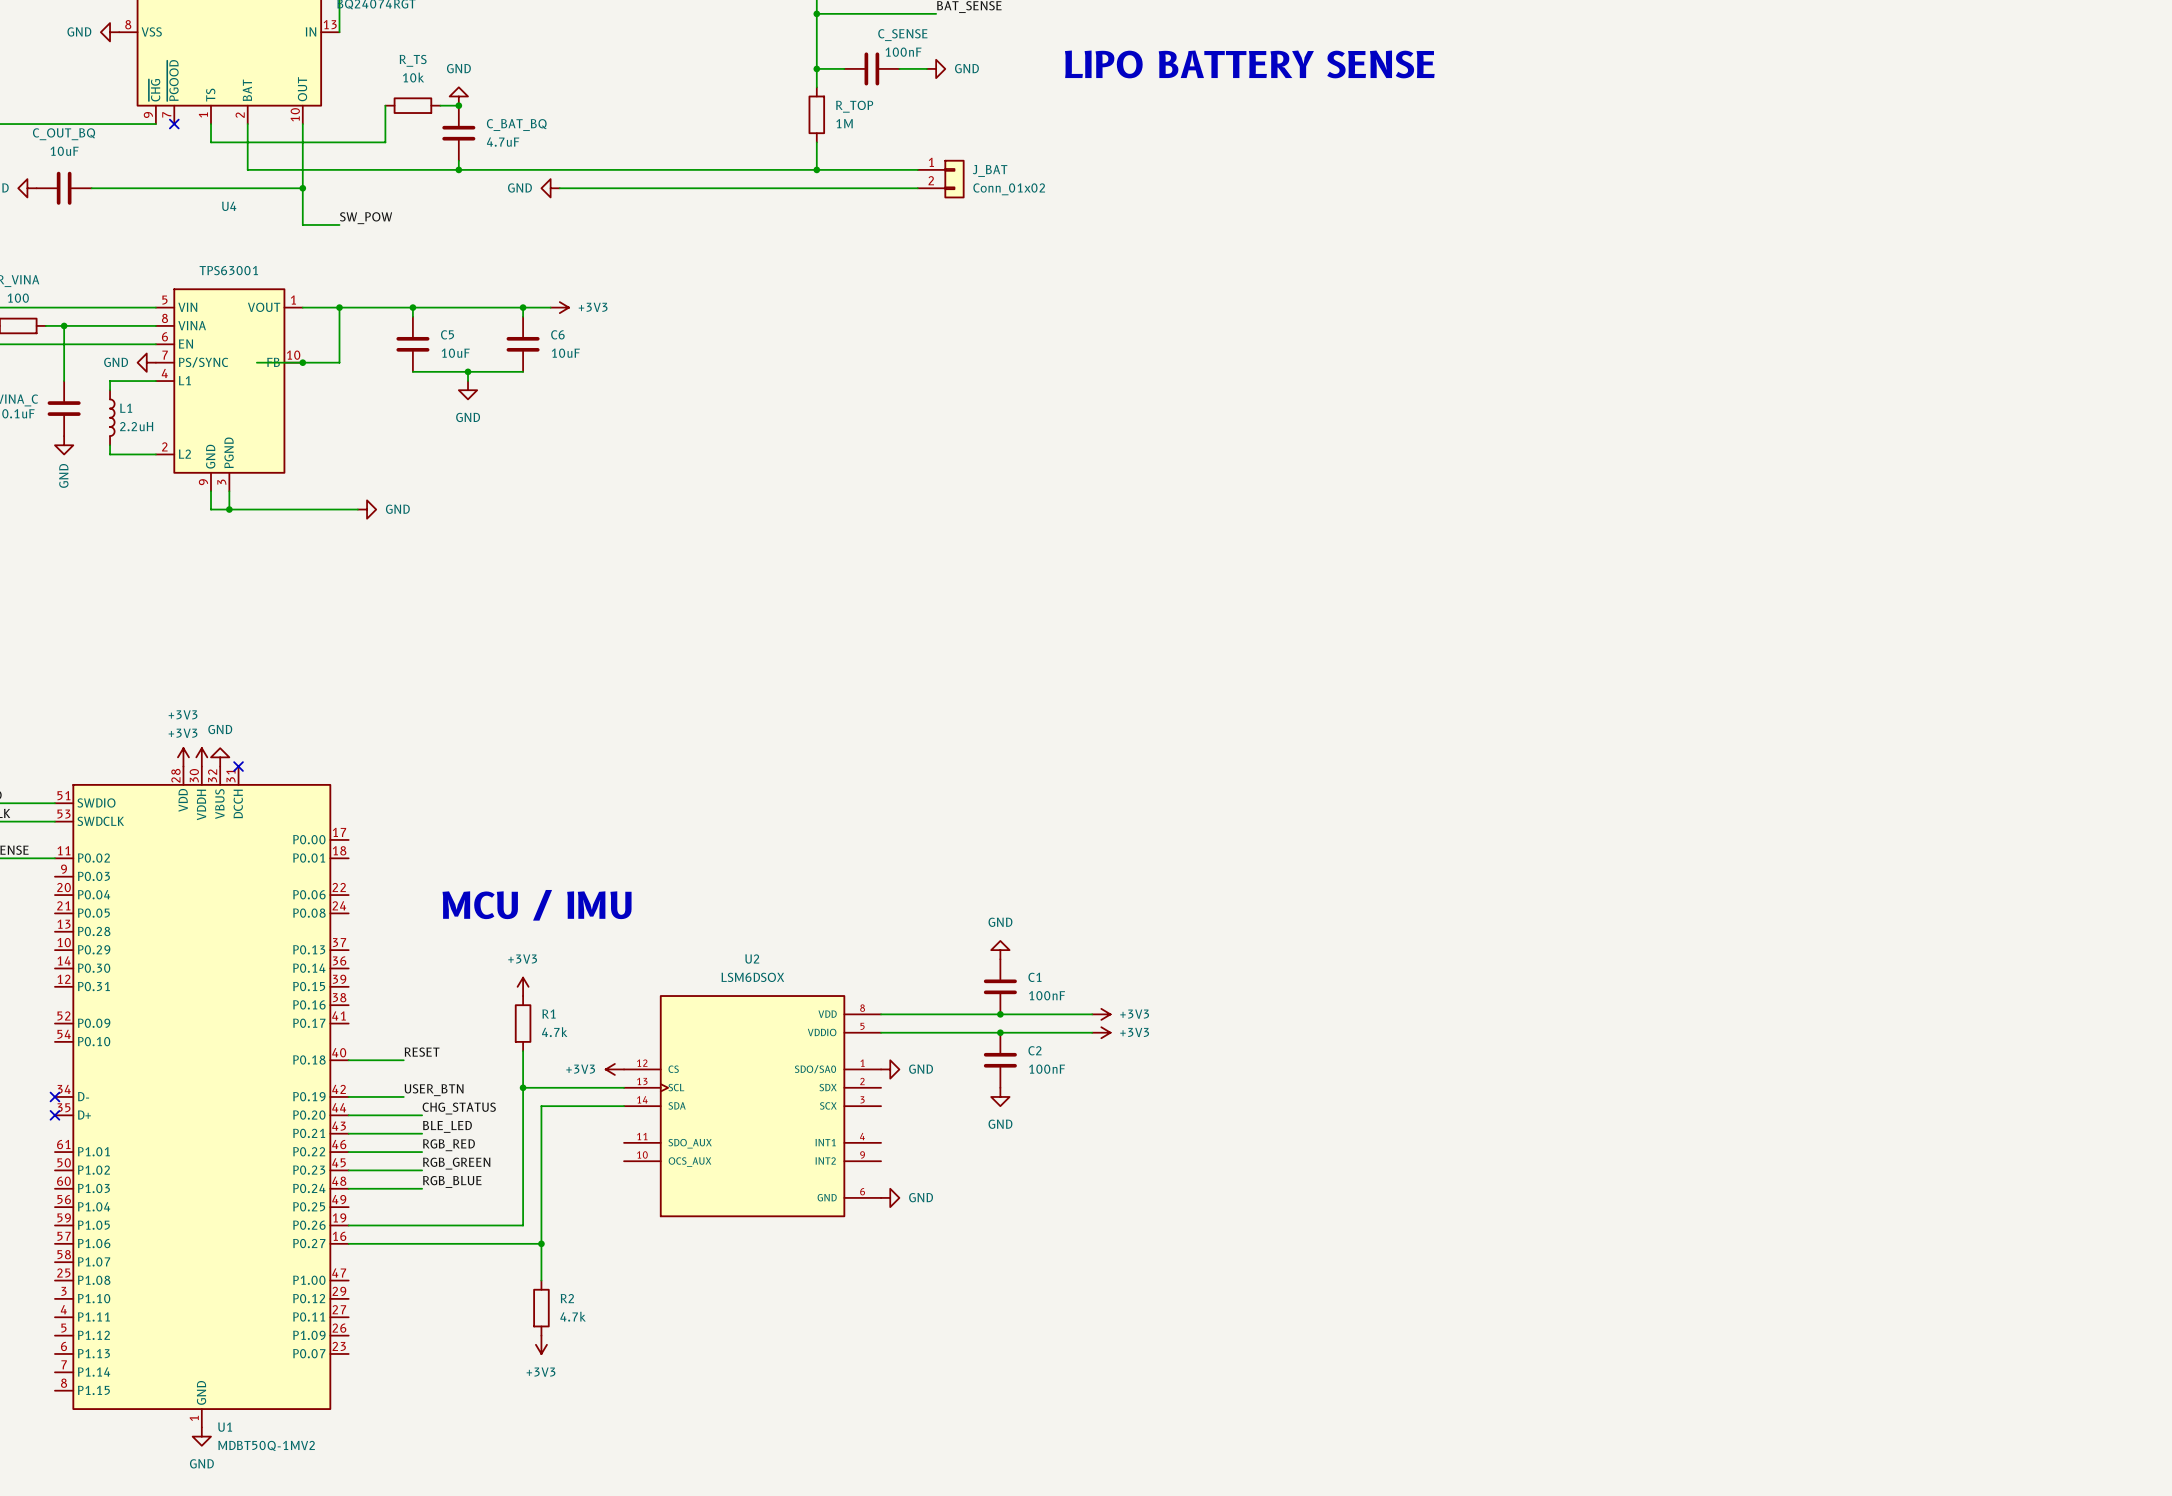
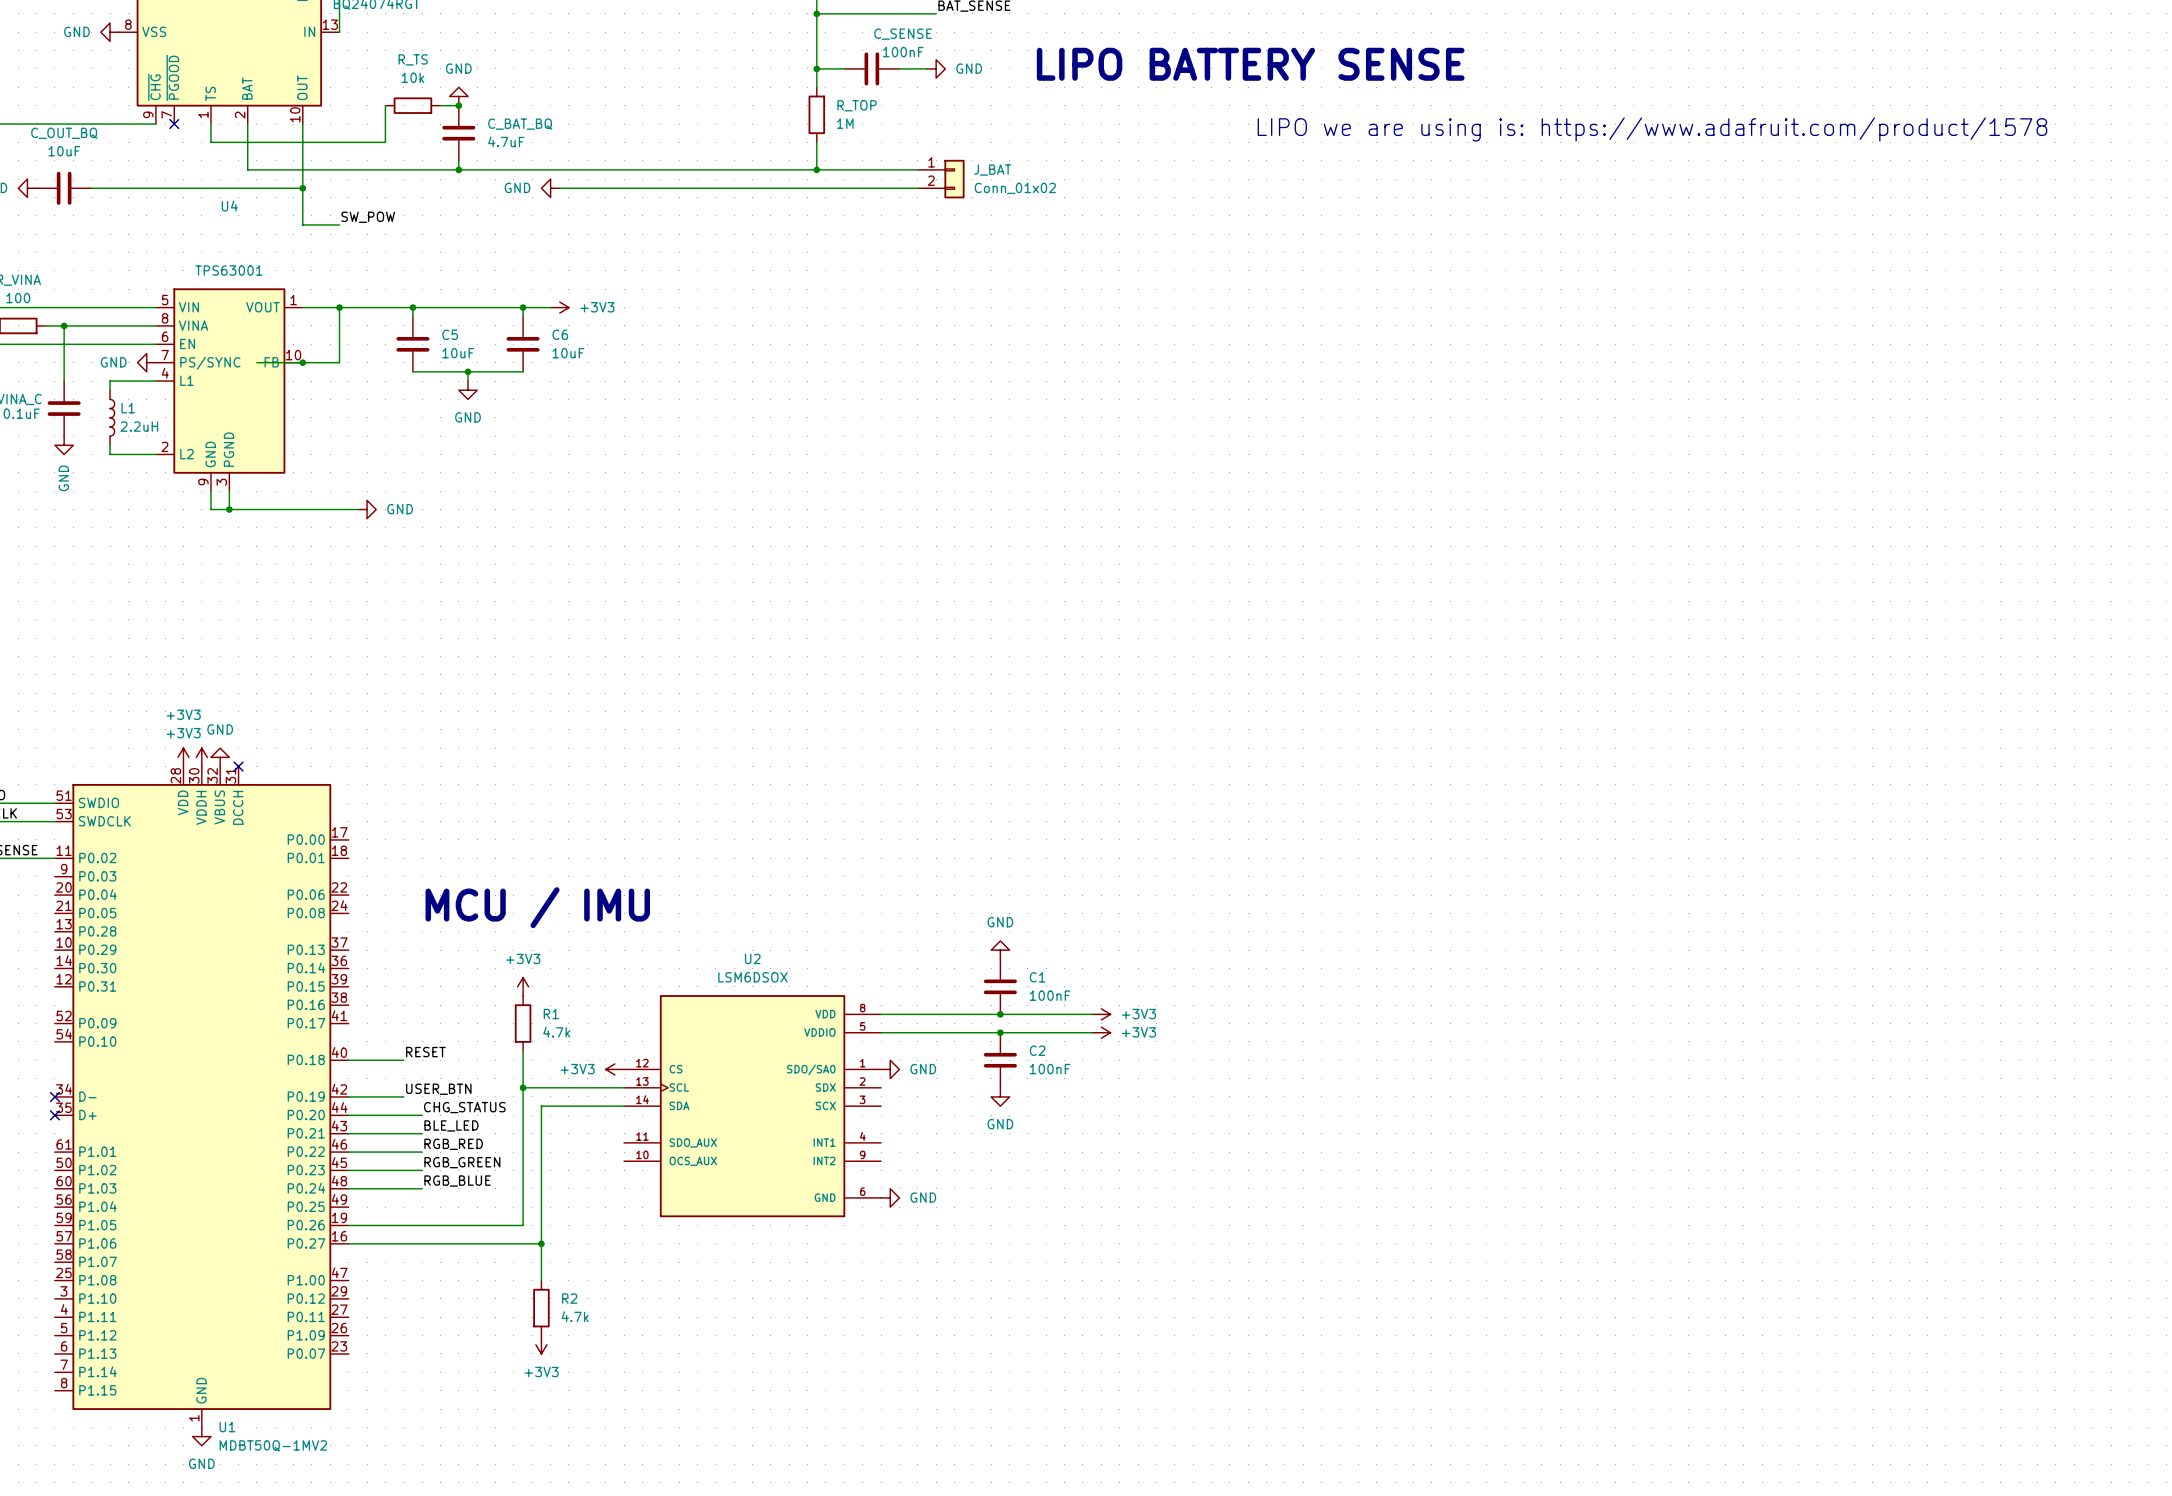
text: none -> LIPO we are using is: https://www.adafruit.com/product/1578 (1652, 129)

